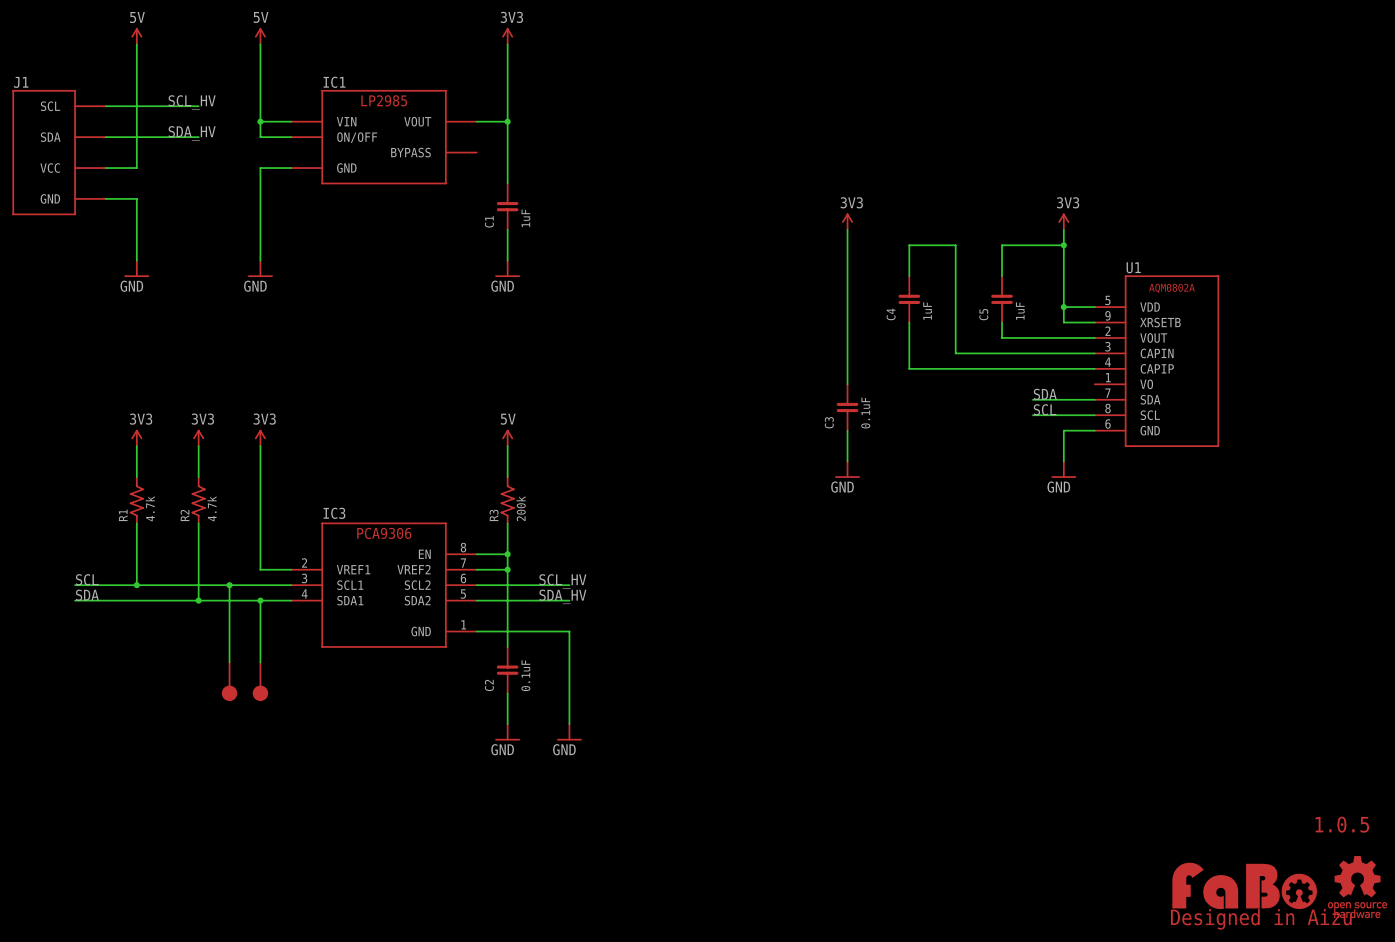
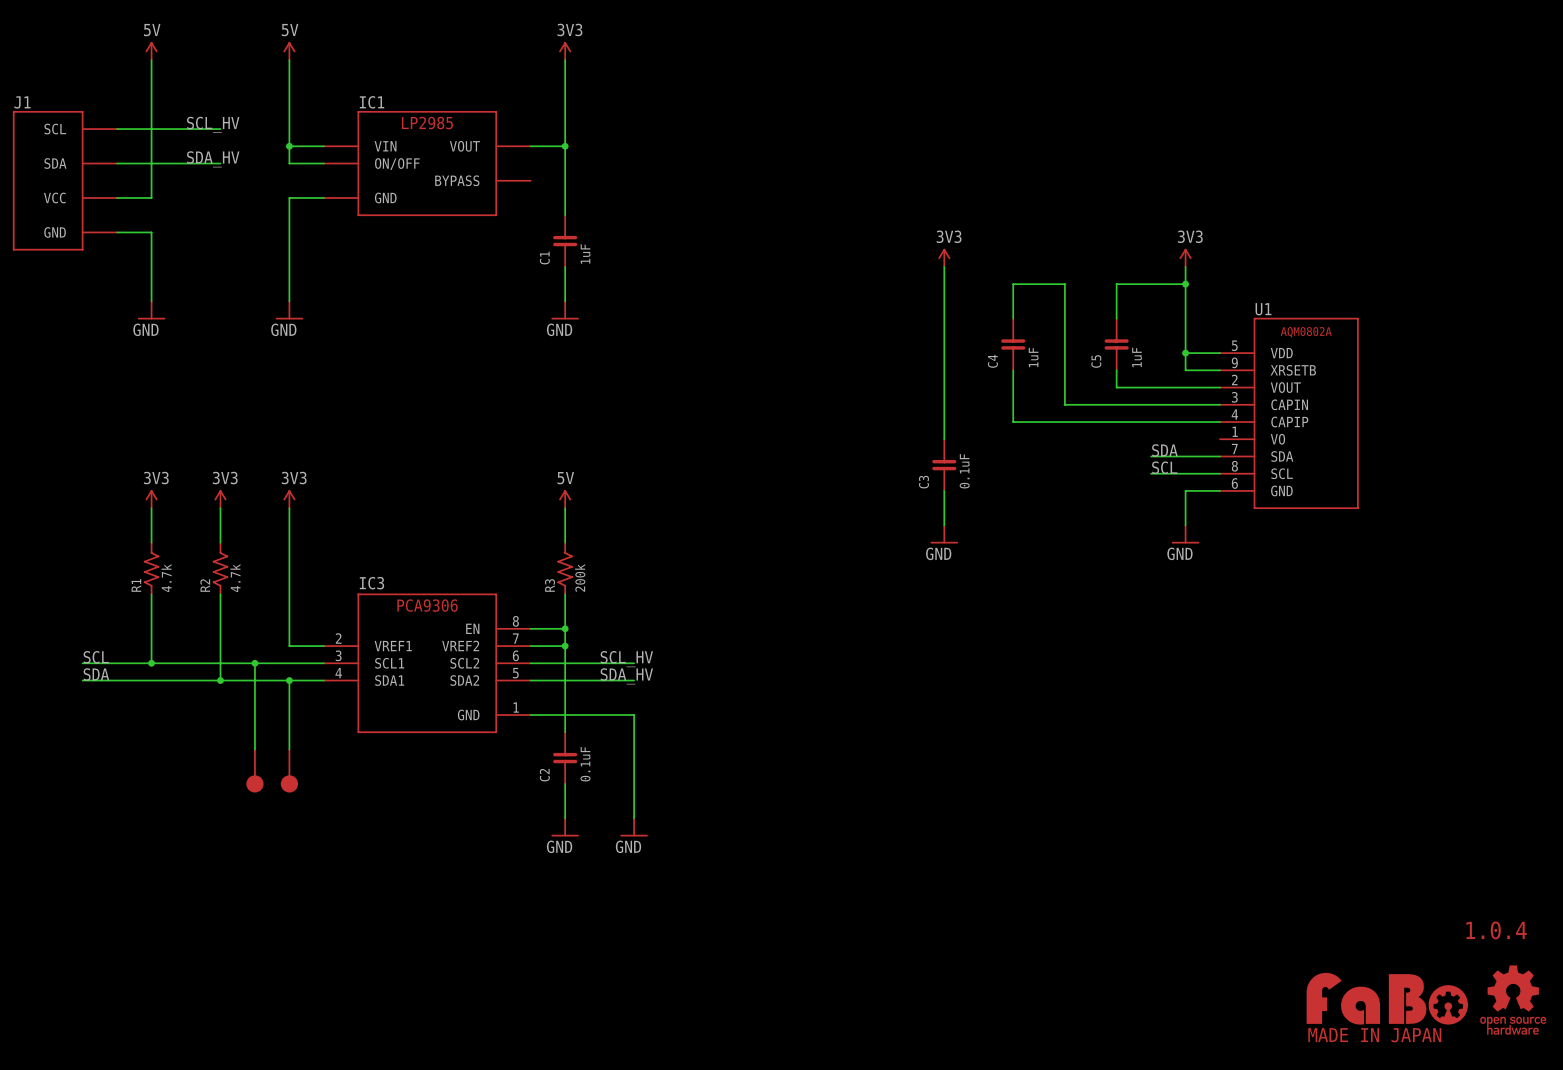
text: 1.0.5 (1342, 824) -> 1.0.4 (1496, 930)
part text: none -> MADE IN JAPAN (1374, 1035)
part text: Designed in Aizu (1261, 919) -> none

